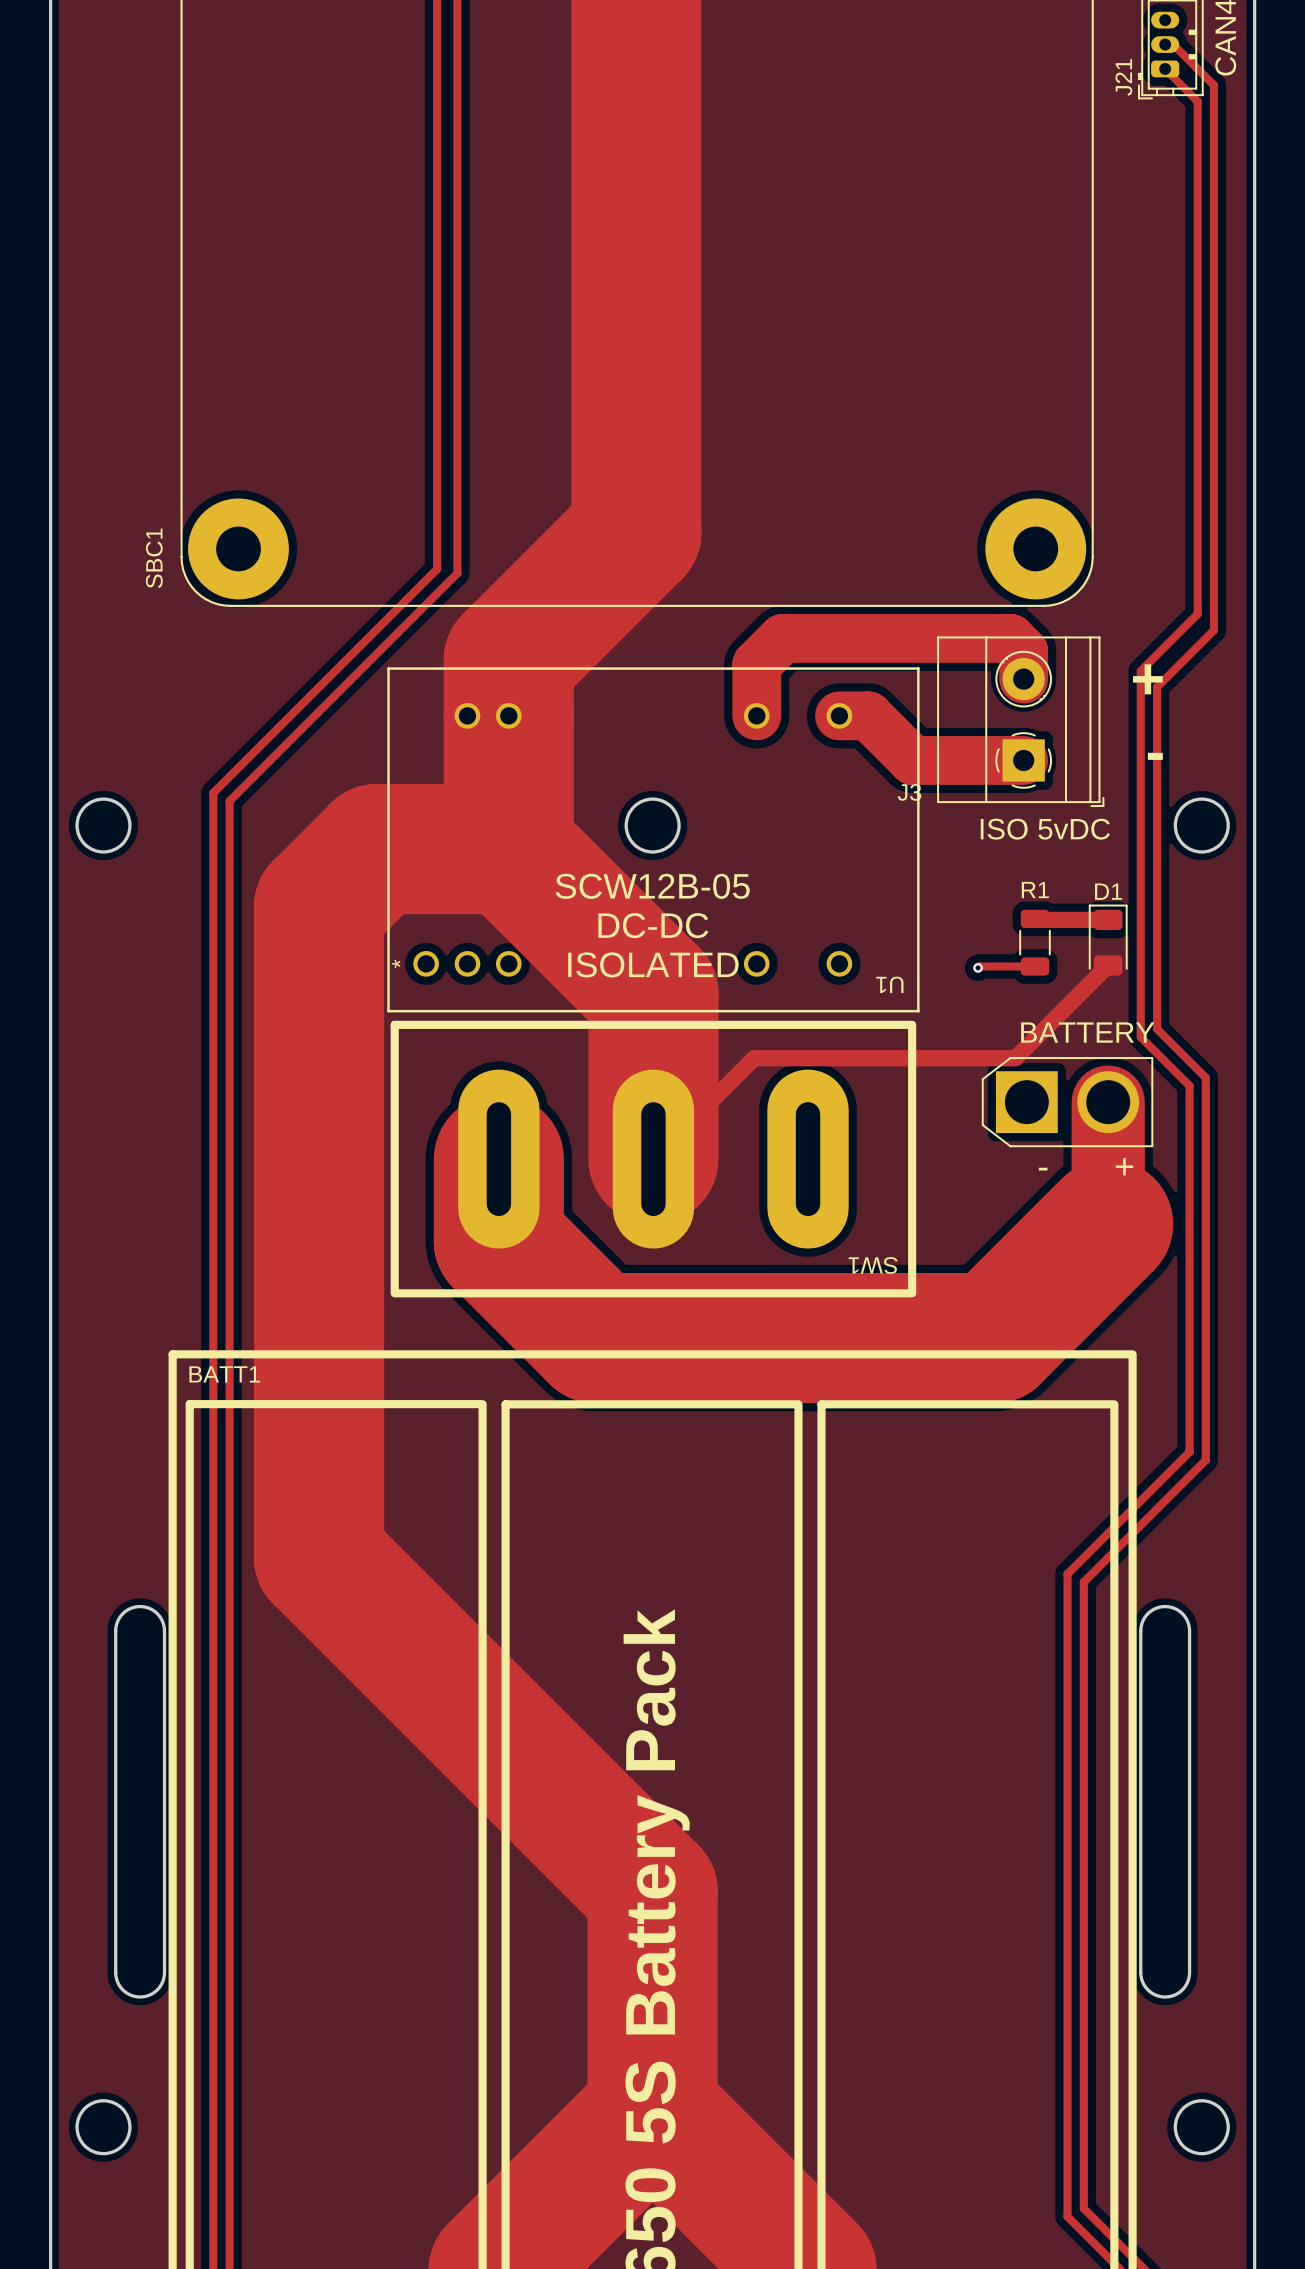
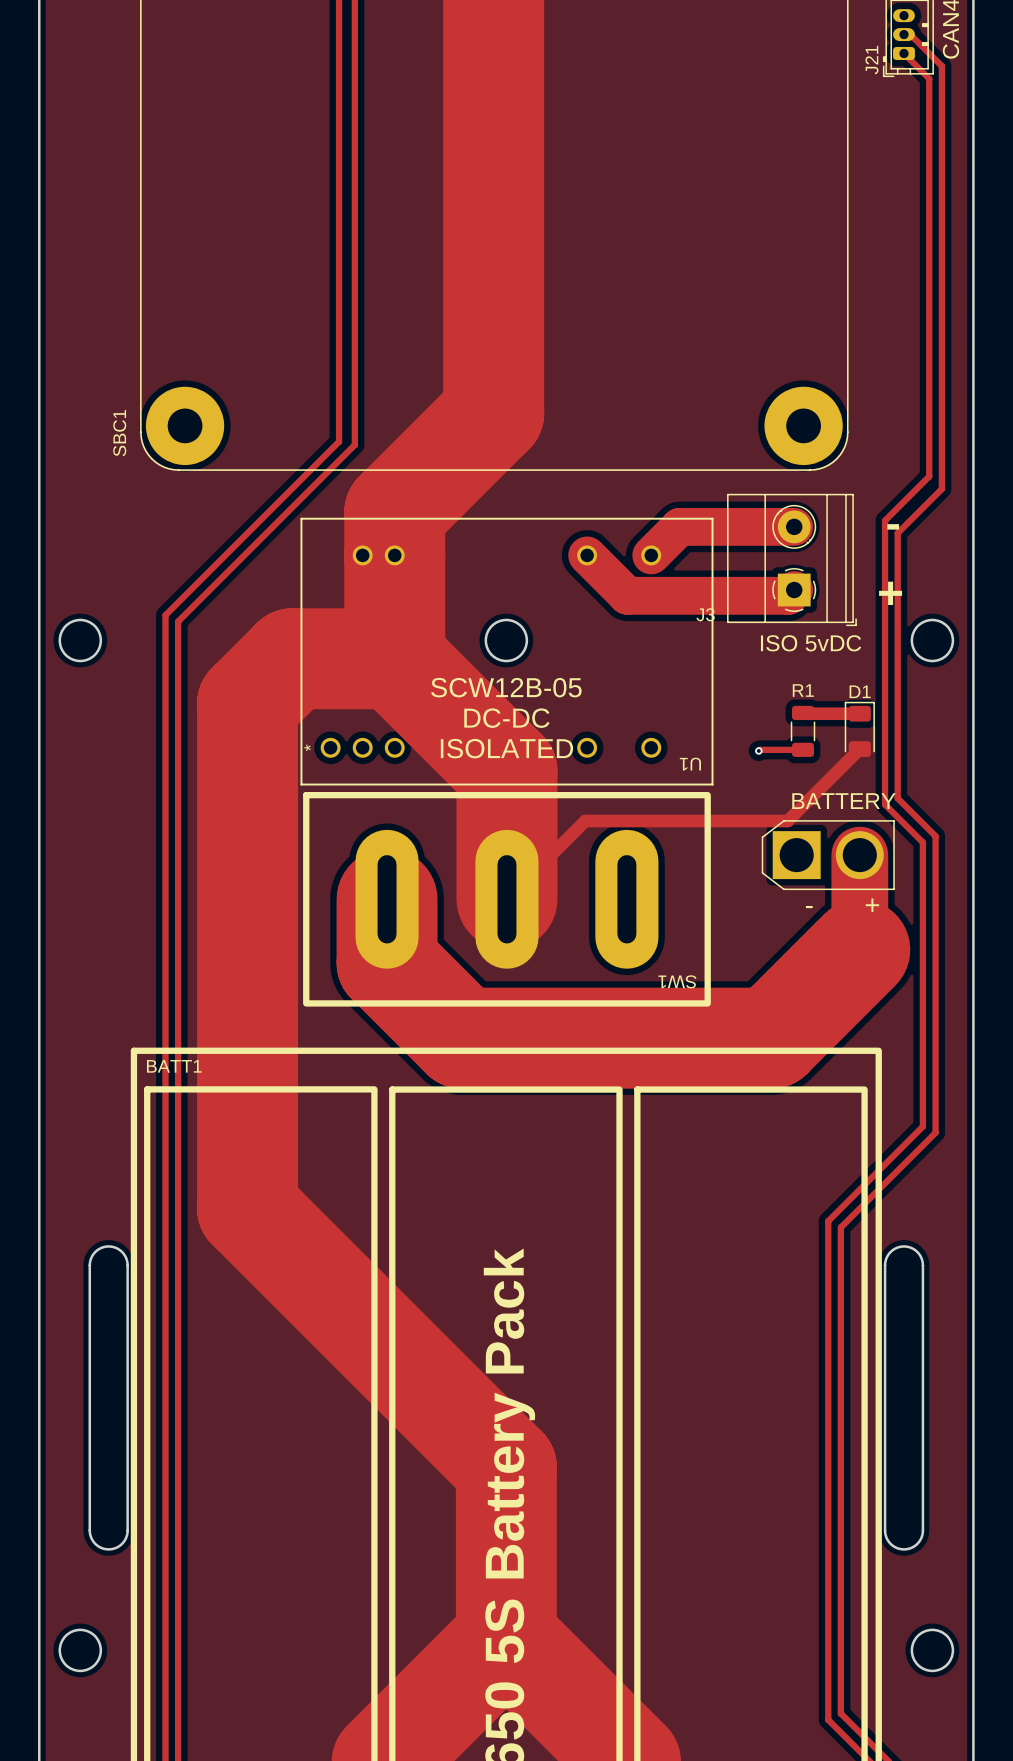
track: (1023, 679) (1023, 651) (1010, 638) (782, 638) (756, 664) (756, 715) -> (794, 590) (788, 595) (627, 595) (587, 555)
text: + (1147, 679) -> - (893, 526)
track: (839, 715) (868, 715) (912, 760) (1023, 760) -> (651, 555) (679, 526) (794, 526)
text: - (1155, 756) -> + (890, 593)

